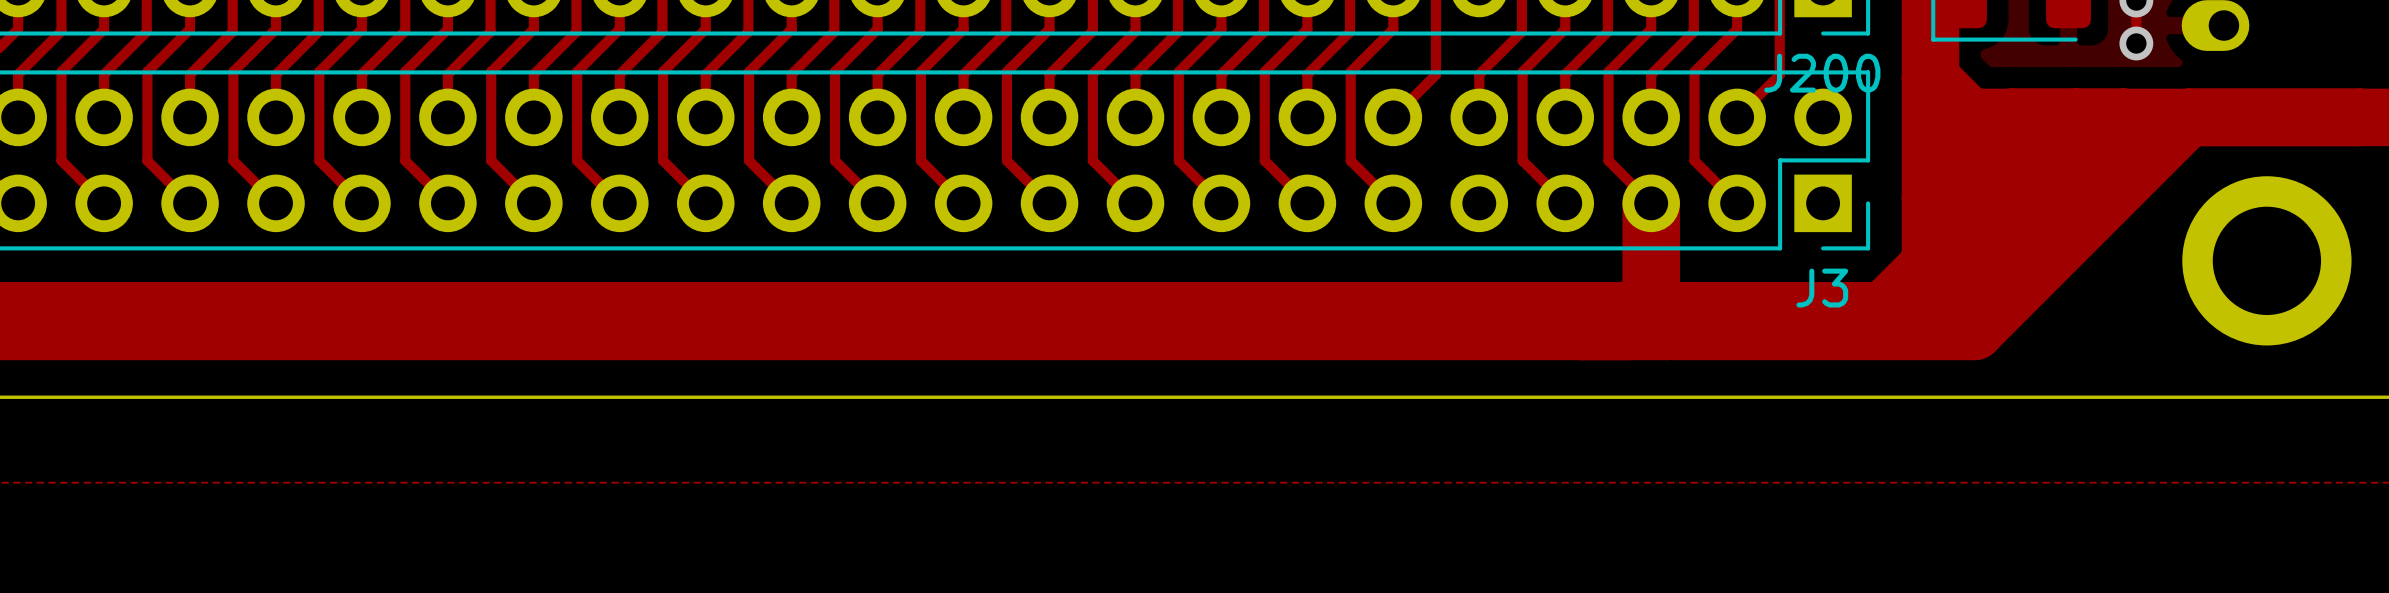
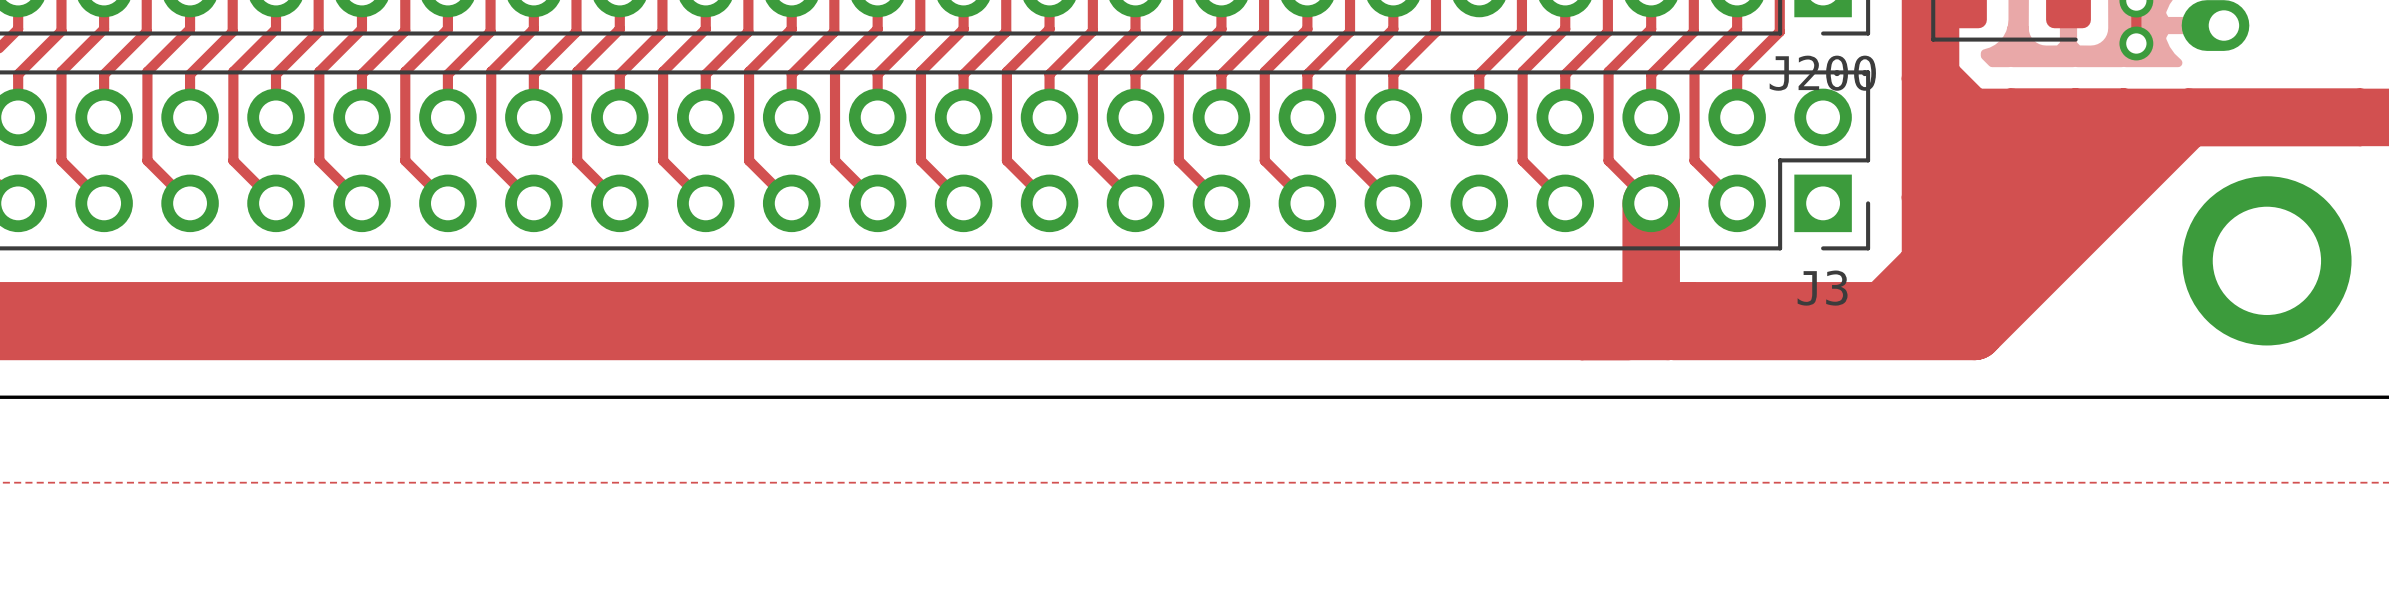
track: (1435, 31) (1435, 74) (1393, 117) -> (1435, 31) (1393, 74) (1393, 117)
track: (1779, 31) (1779, 74) (1737, 117) -> (1779, 31) (1737, 74) (1737, 117)

